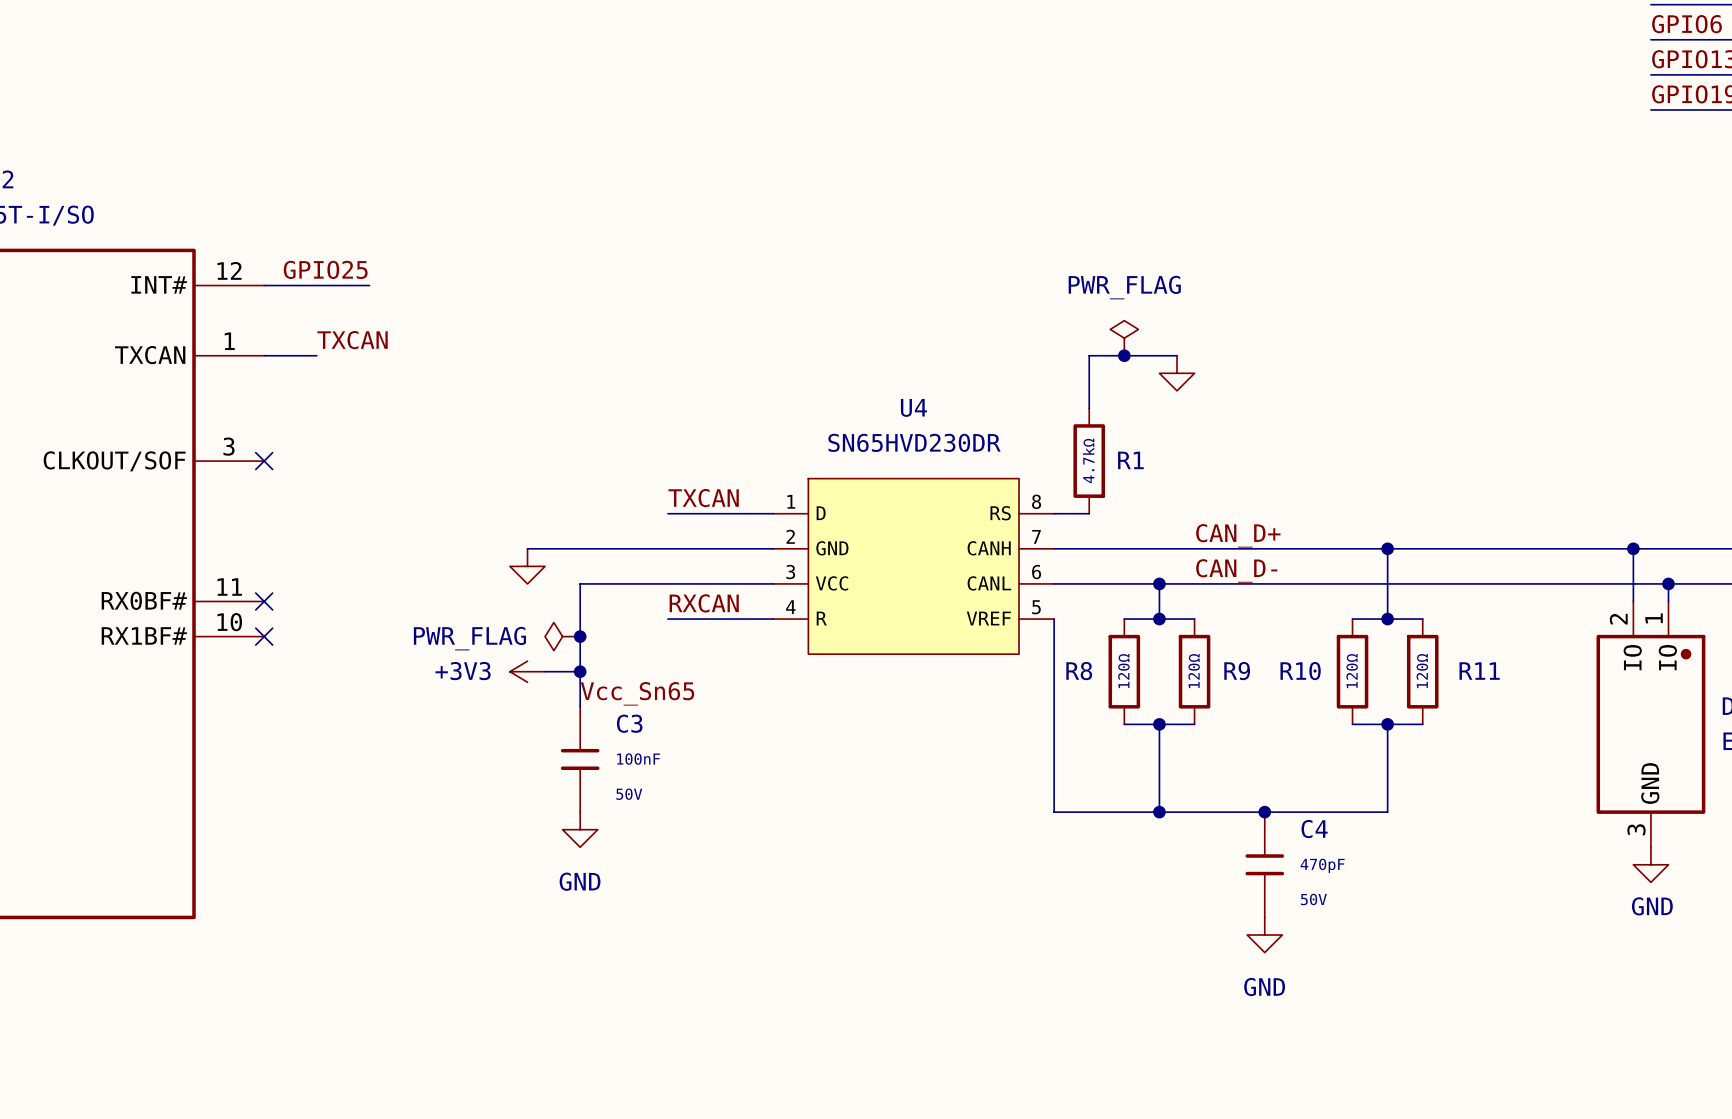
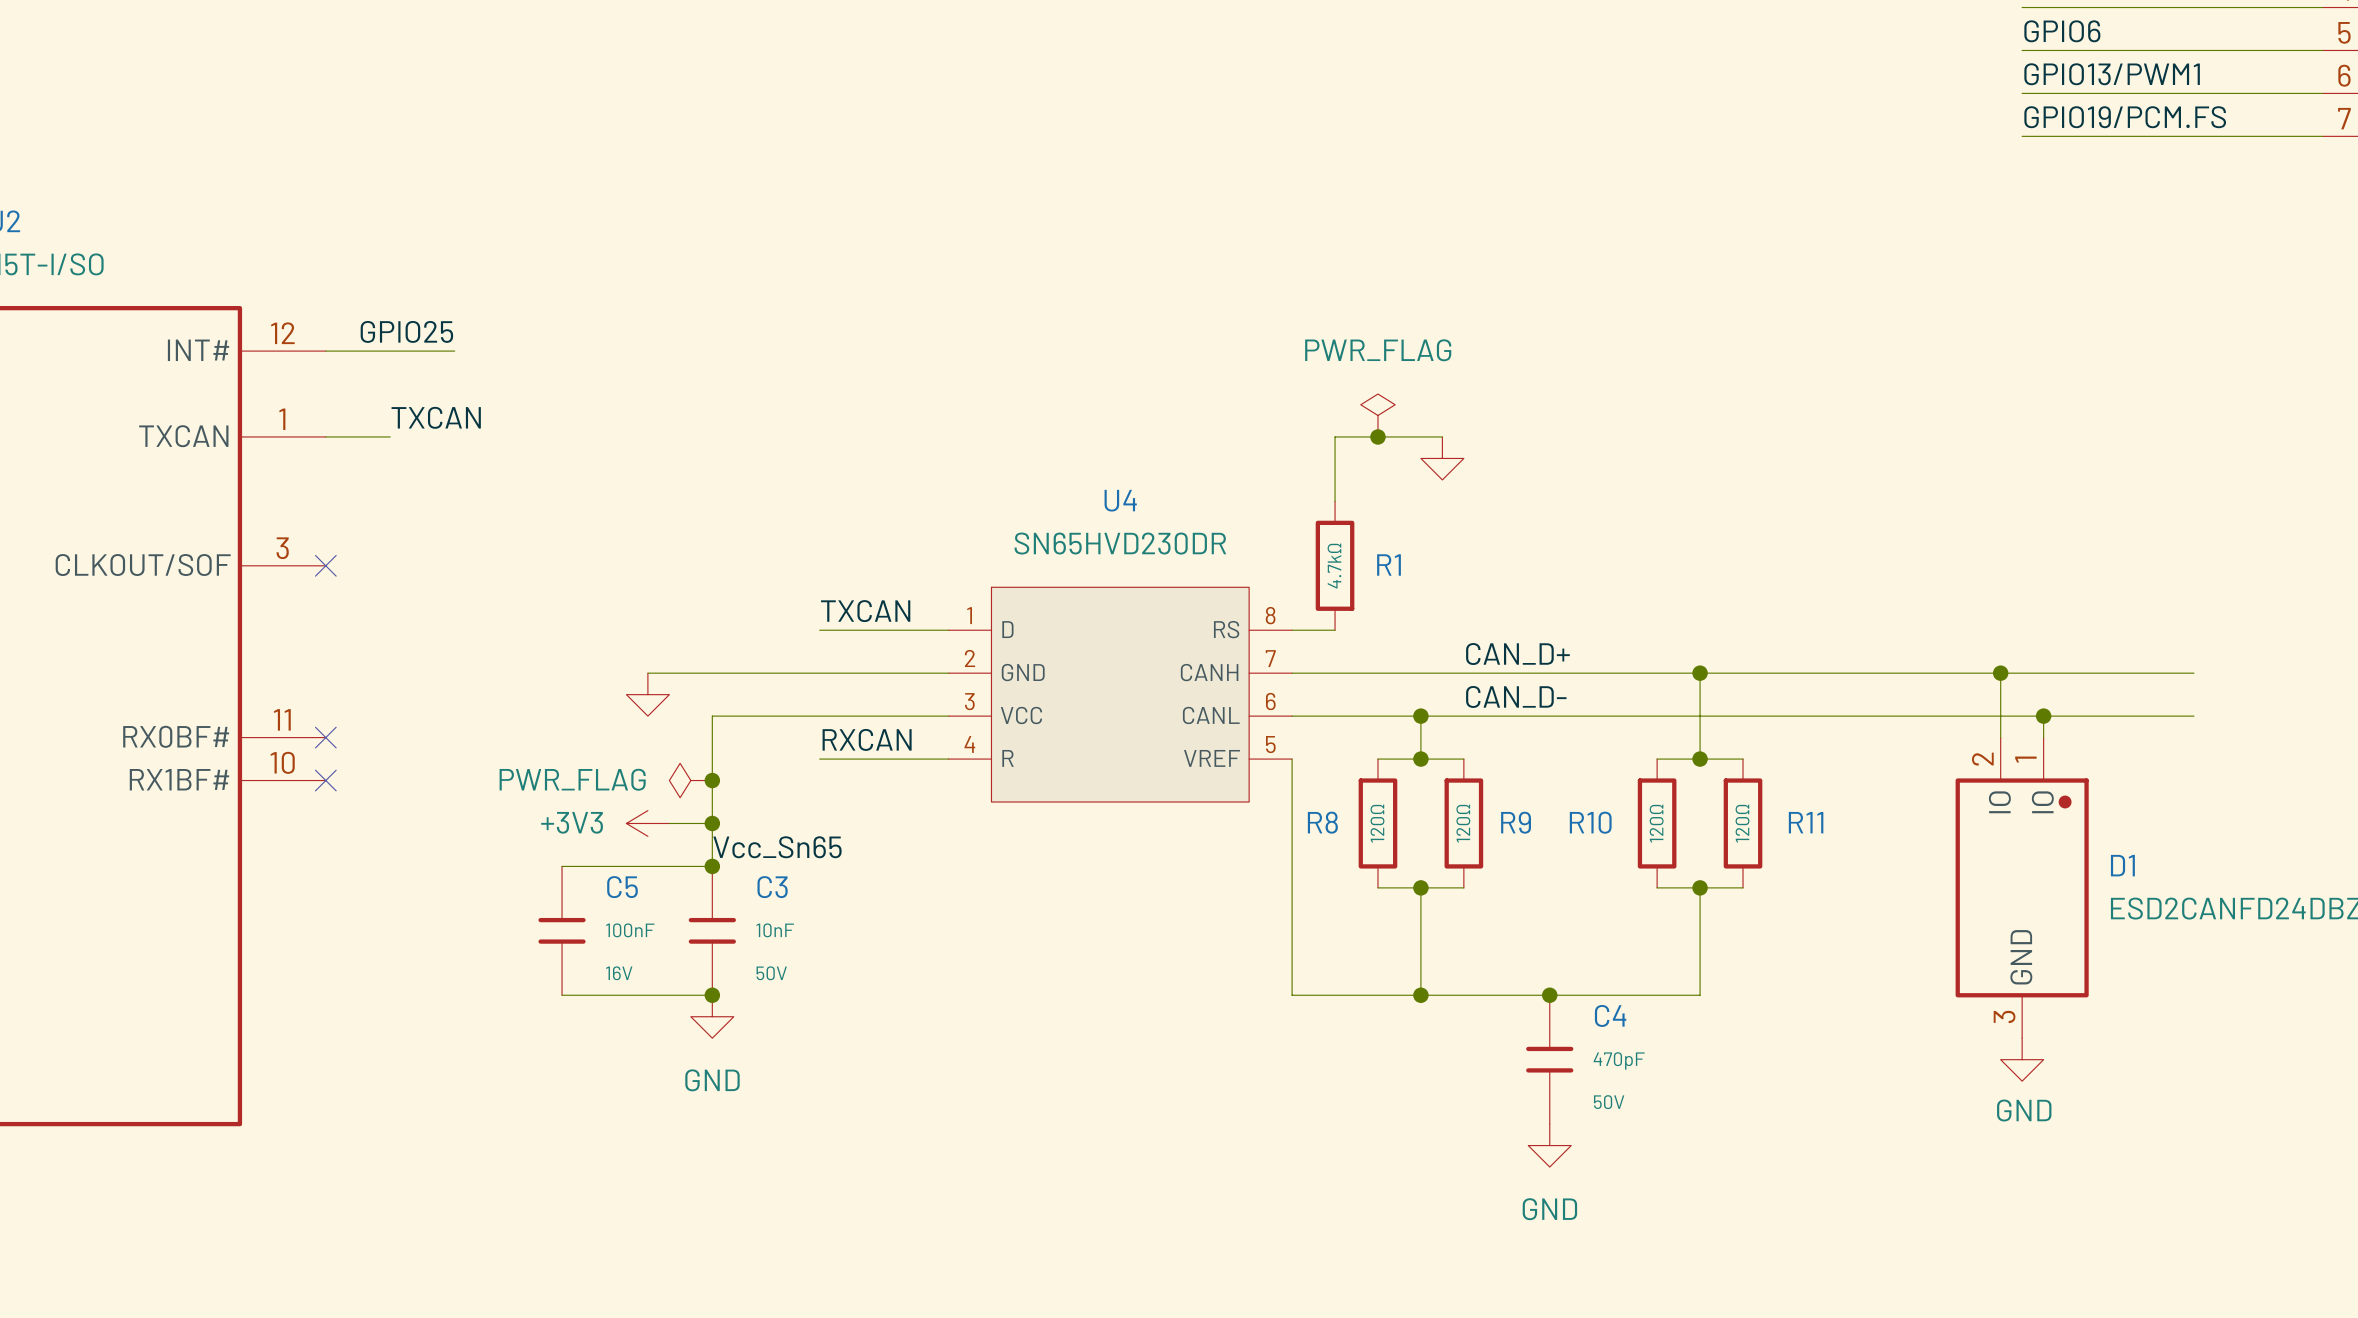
wire: none -> (562, 866) (712, 866)
junction: none -> (712, 866)
C5: none -> 100nF (562, 930)
C3 value: 100nF (638, 759) -> 10nF (775, 930)
wire: none -> (562, 995) (712, 995)
junction: none -> (712, 995)

